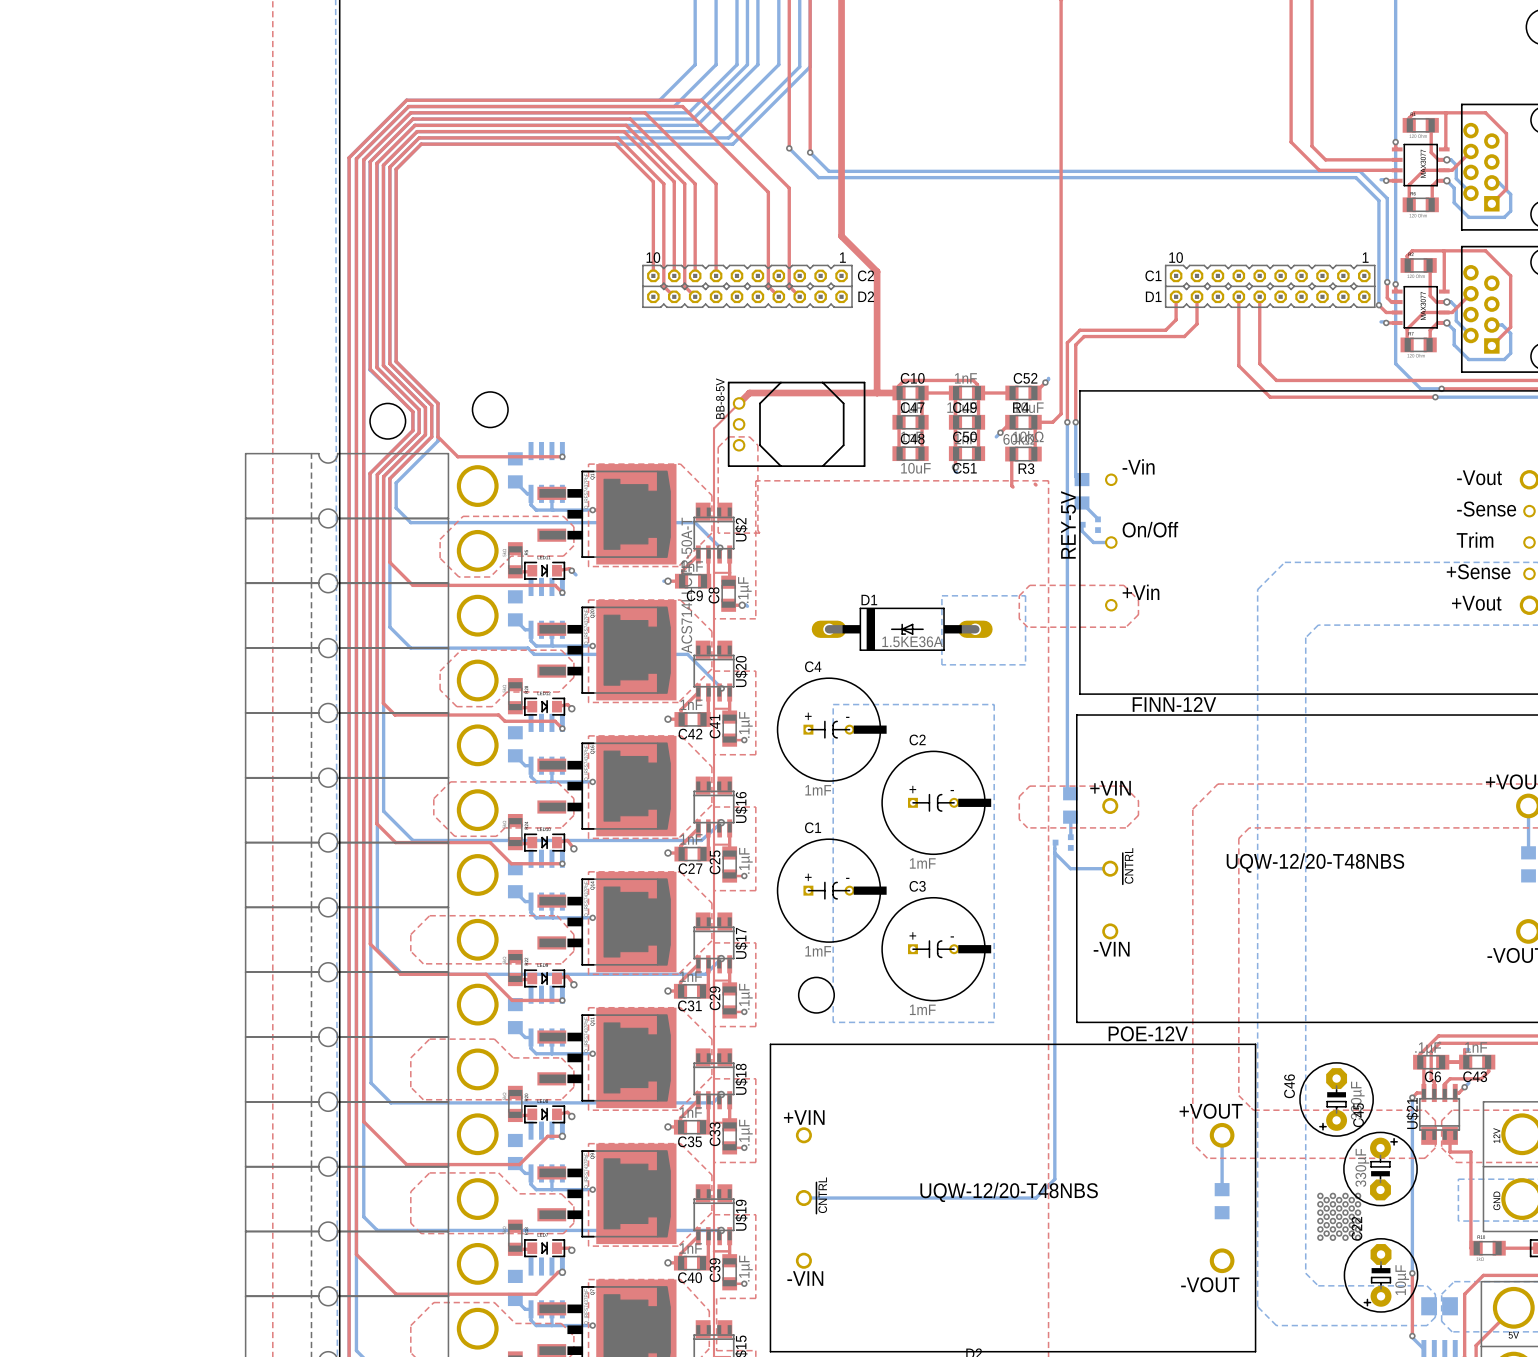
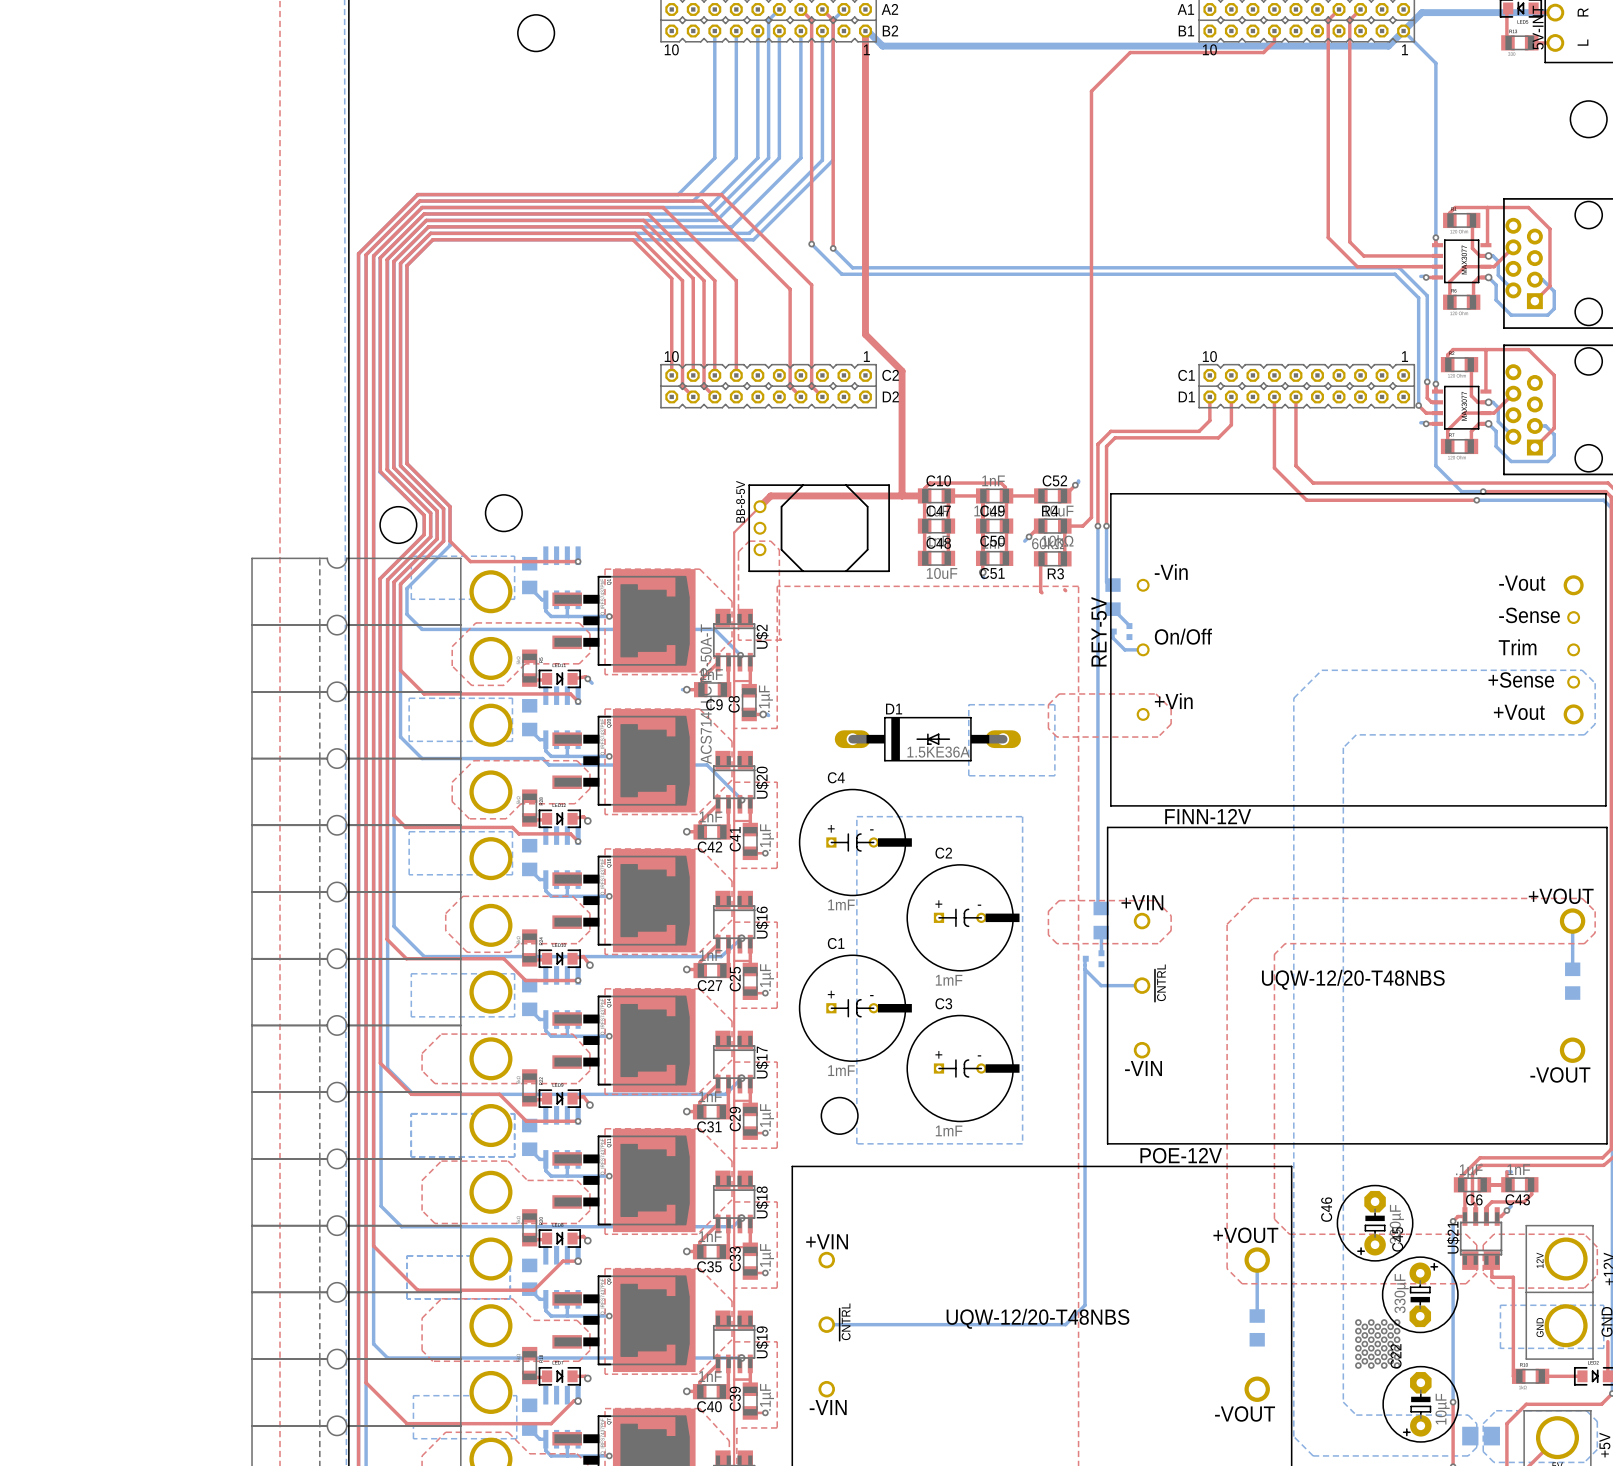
bottom zone outline: none -> (411, 556) (411, 599) (514, 599) (514, 556) (411, 556)
bottom zone outline: none -> (409, 698) (512, 698) (512, 741) (409, 741) (409, 698)
bottom zone outline: none -> (409, 831) (409, 874) (512, 874) (512, 831) (409, 831)
bottom zone outline: none -> (411, 973) (514, 973) (514, 1016) (411, 1016) (411, 973)
bottom zone outline: none -> (411, 1113) (411, 1156) (514, 1156) (514, 1113) (411, 1113)
bottom zone outline: none -> (406, 1255) (510, 1255) (510, 1298) (406, 1298) (406, 1255)
bottom zone outline: none -> (413, 1395) (516, 1395) (516, 1438) (413, 1438) (413, 1395)

